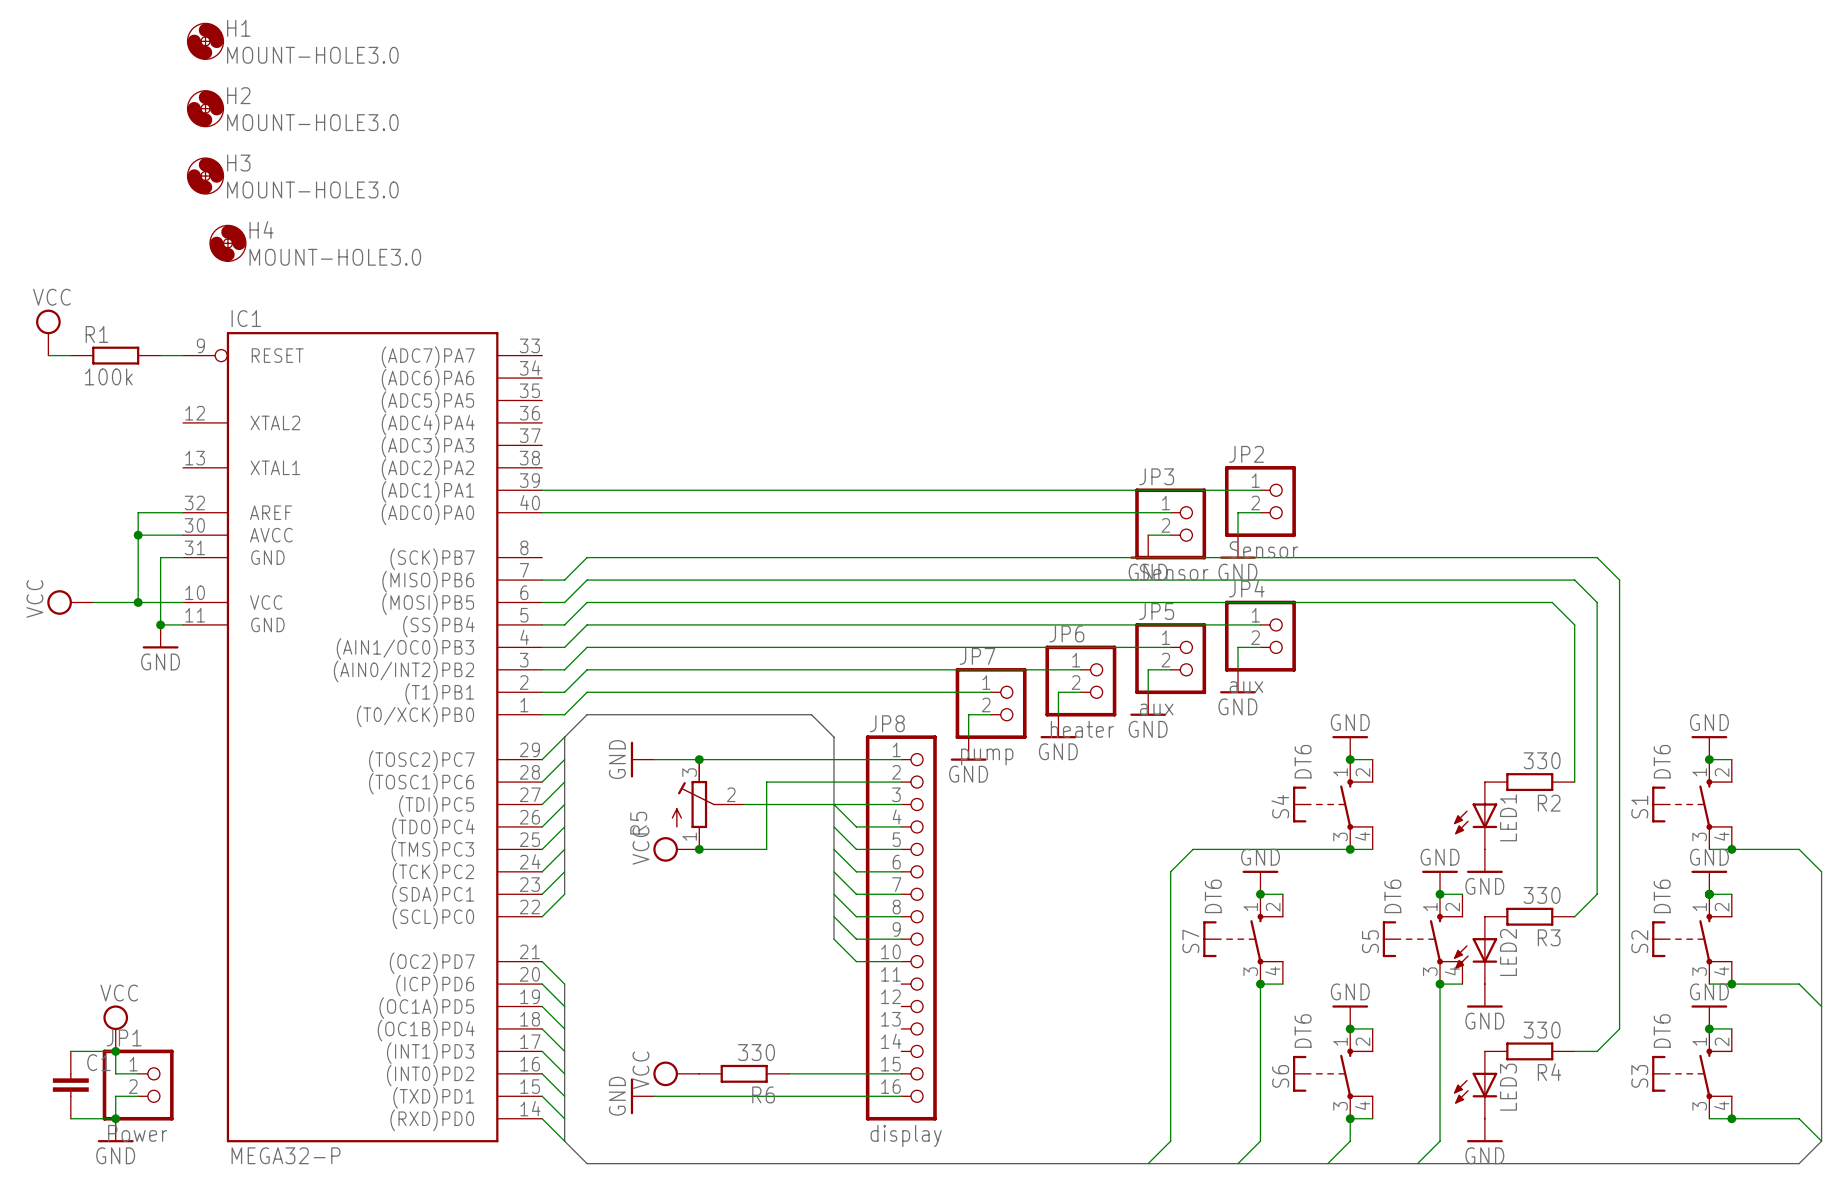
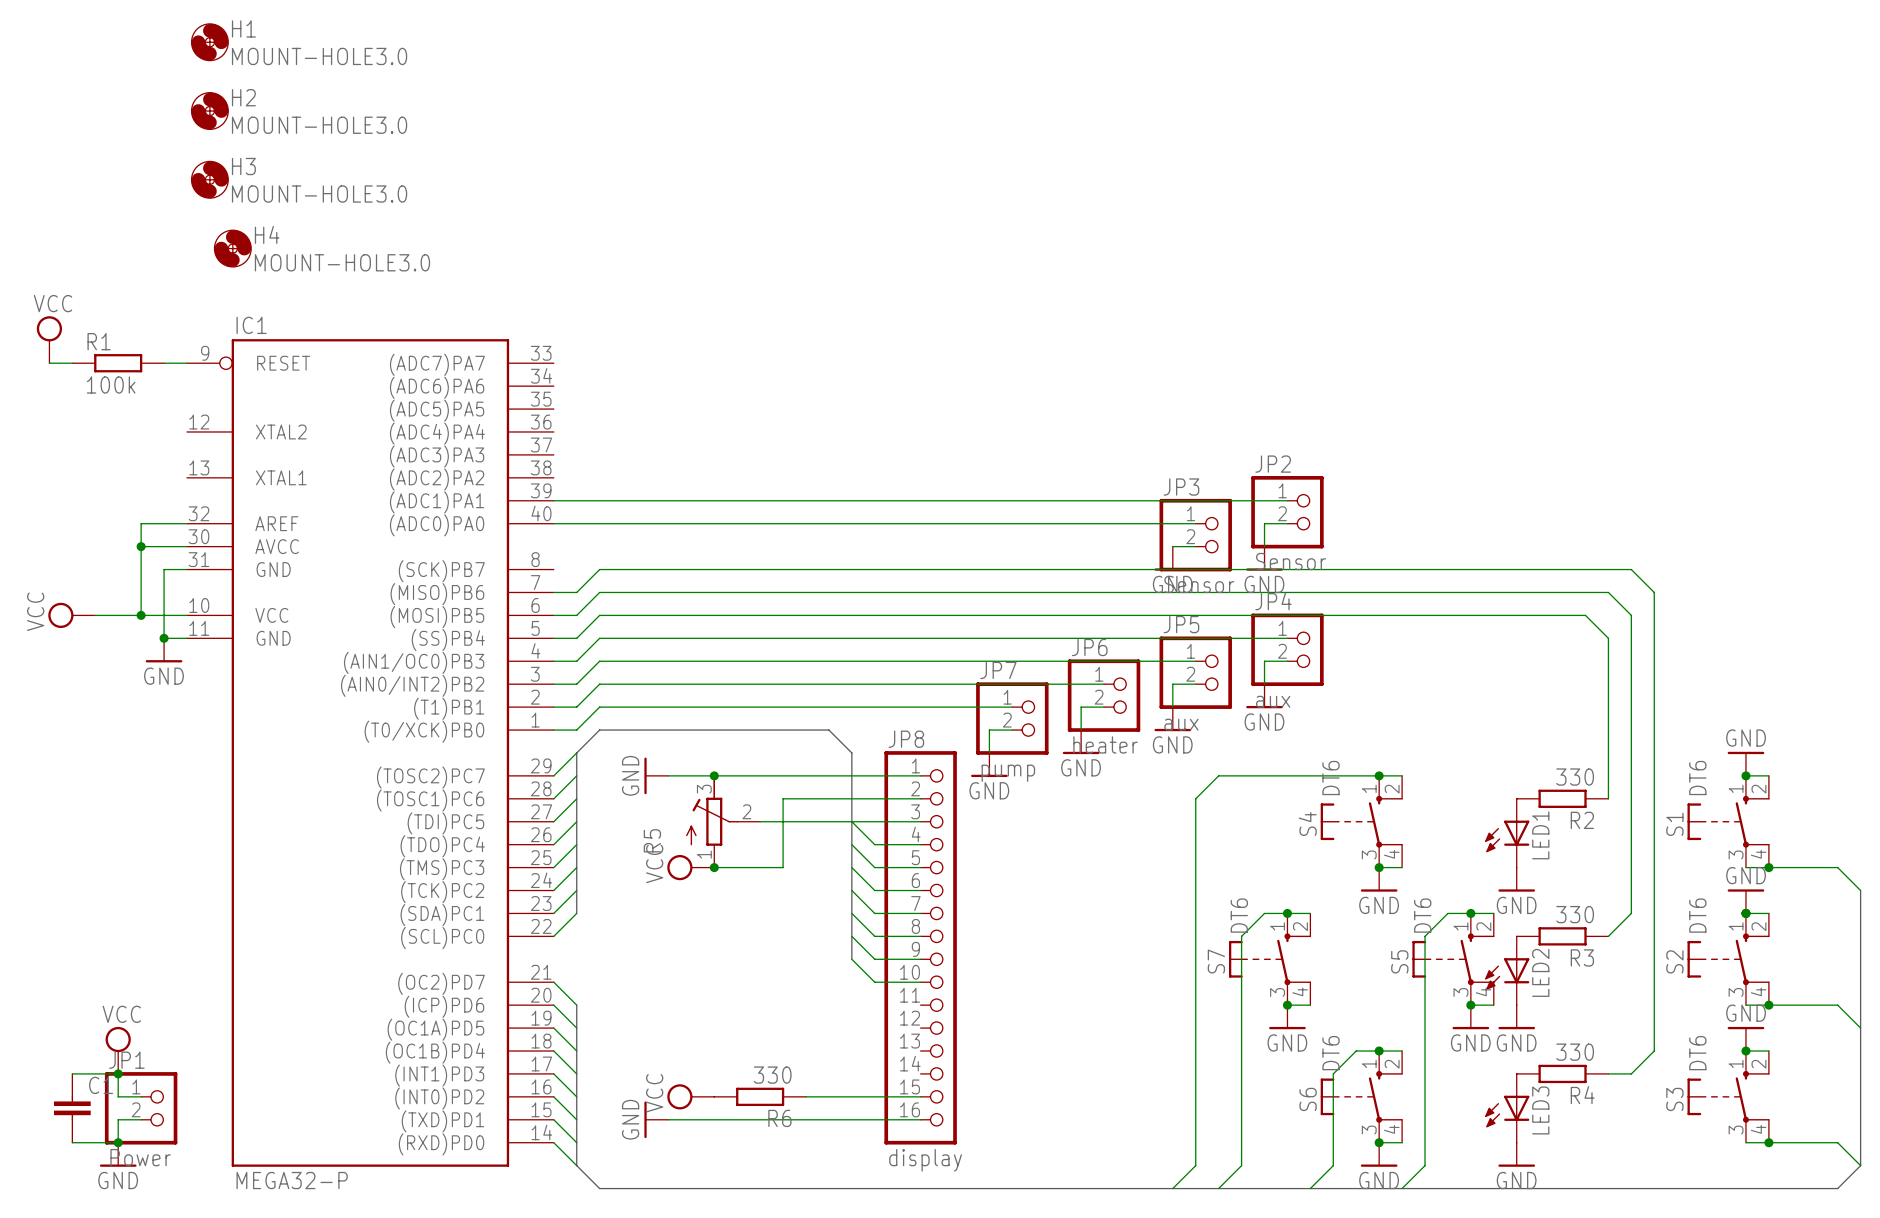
power symbol: GND (1350, 747) -> none
wire: (1350, 849) (1193, 849) (1170, 871) -> (1379, 775) (1218, 775) (1195, 798) (1195, 890)
power symbol: none -> GND (1379, 879)
power symbol: GND (1260, 882) -> none
power symbol: GND (1440, 882) -> none
wire: none -> (1287, 913) (1264, 913) (1241, 936) (1241, 1165) (1218, 1188)
wire: none -> (1470, 913) (1447, 913) (1425, 936) (1425, 1165) (1402, 1188)
wire: (1260, 984) (1260, 1141) (1238, 1163) -> none
wire: (1440, 984) (1440, 1141) (1417, 1163) -> none
power symbol: none -> GND (1287, 1017)
power symbol: none -> GND (1470, 1017)
power symbol: GND (1350, 1017) -> none
wire: none -> (1379, 1051) (1356, 1051) (1333, 1073) (1333, 1165) (1310, 1188)
wire: (1350, 1118) (1350, 1141) (1327, 1163) -> none
power symbol: none -> GND (1379, 1154)

